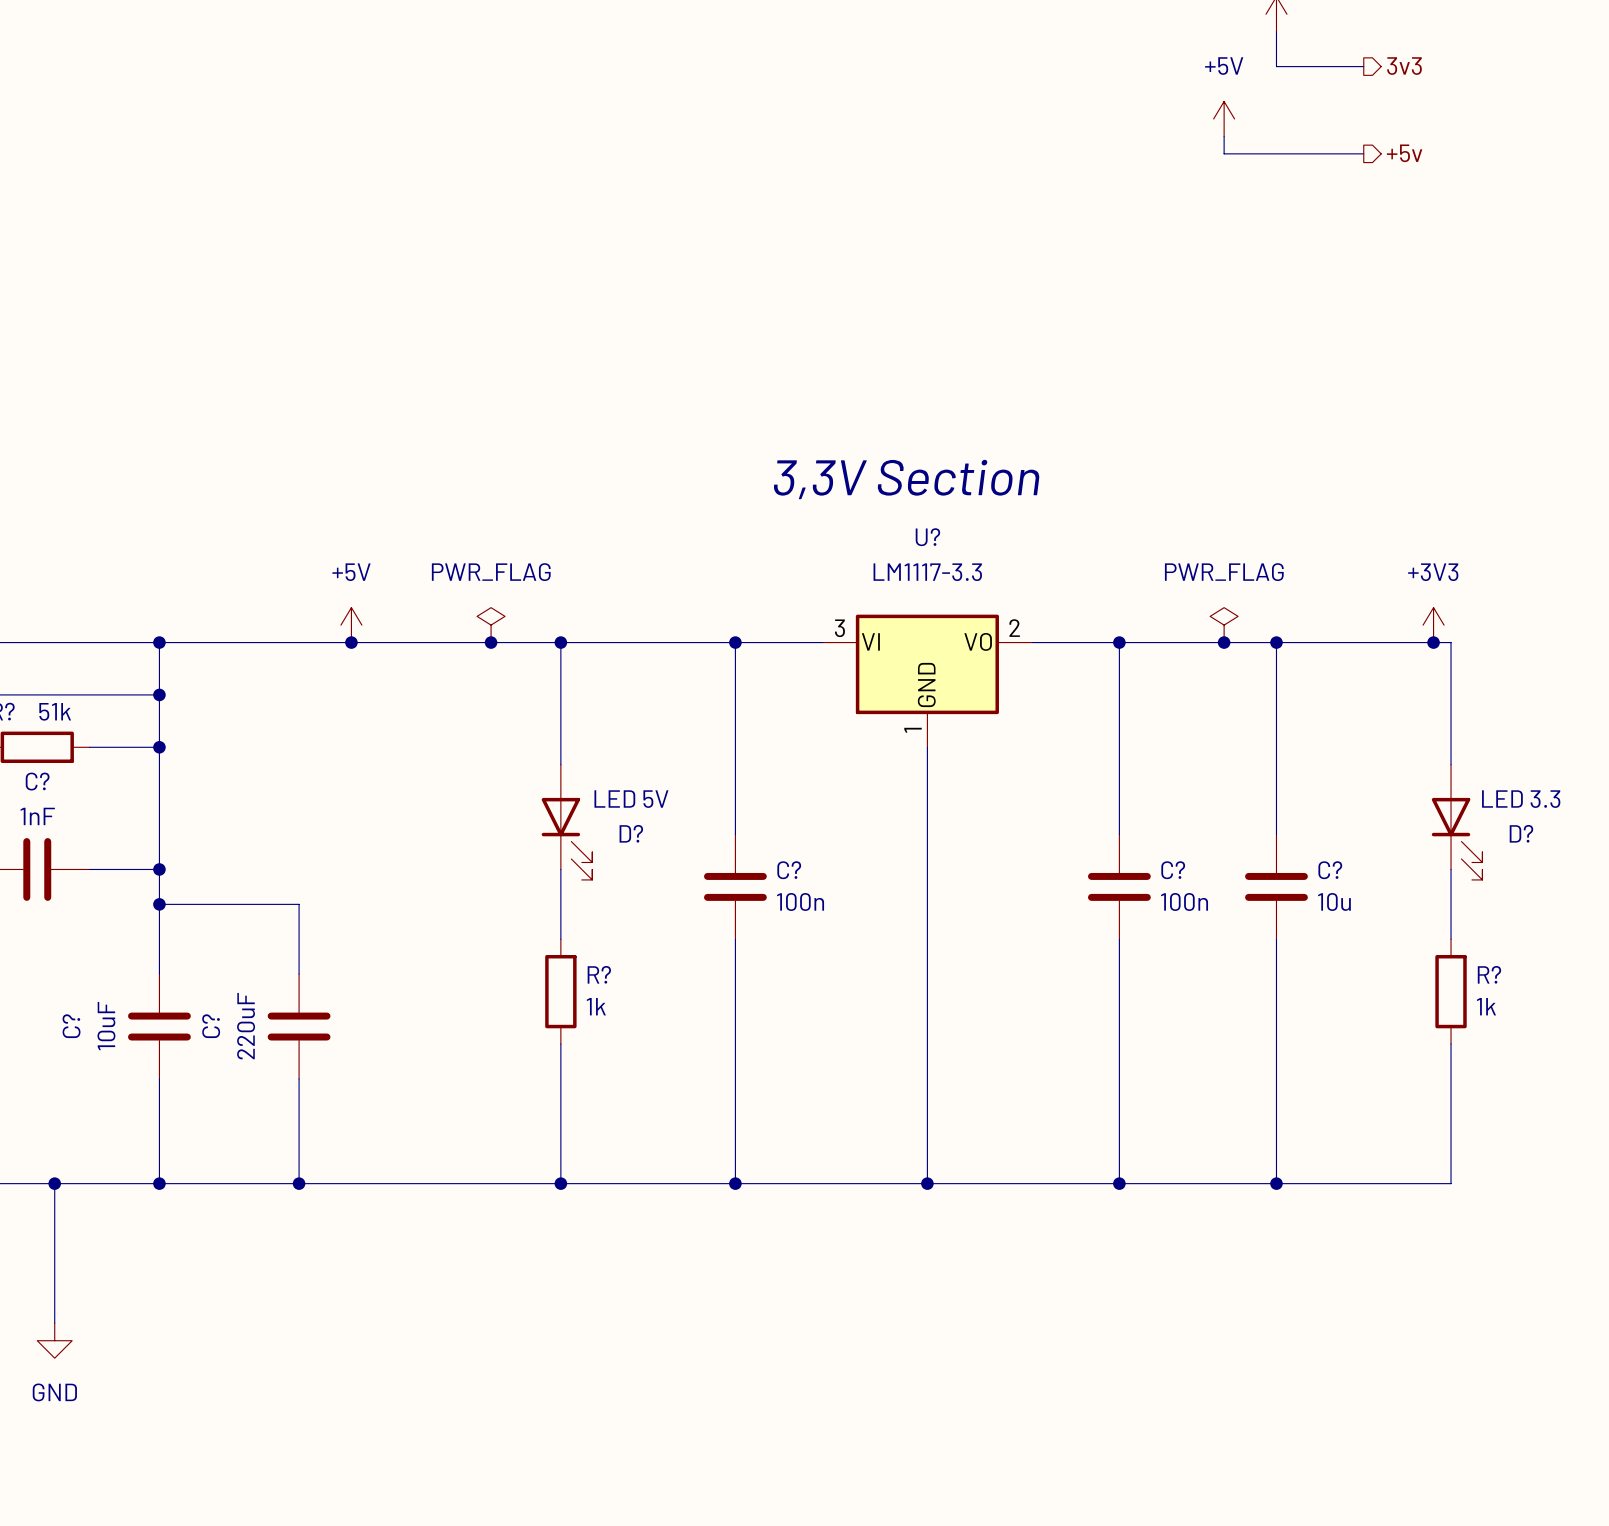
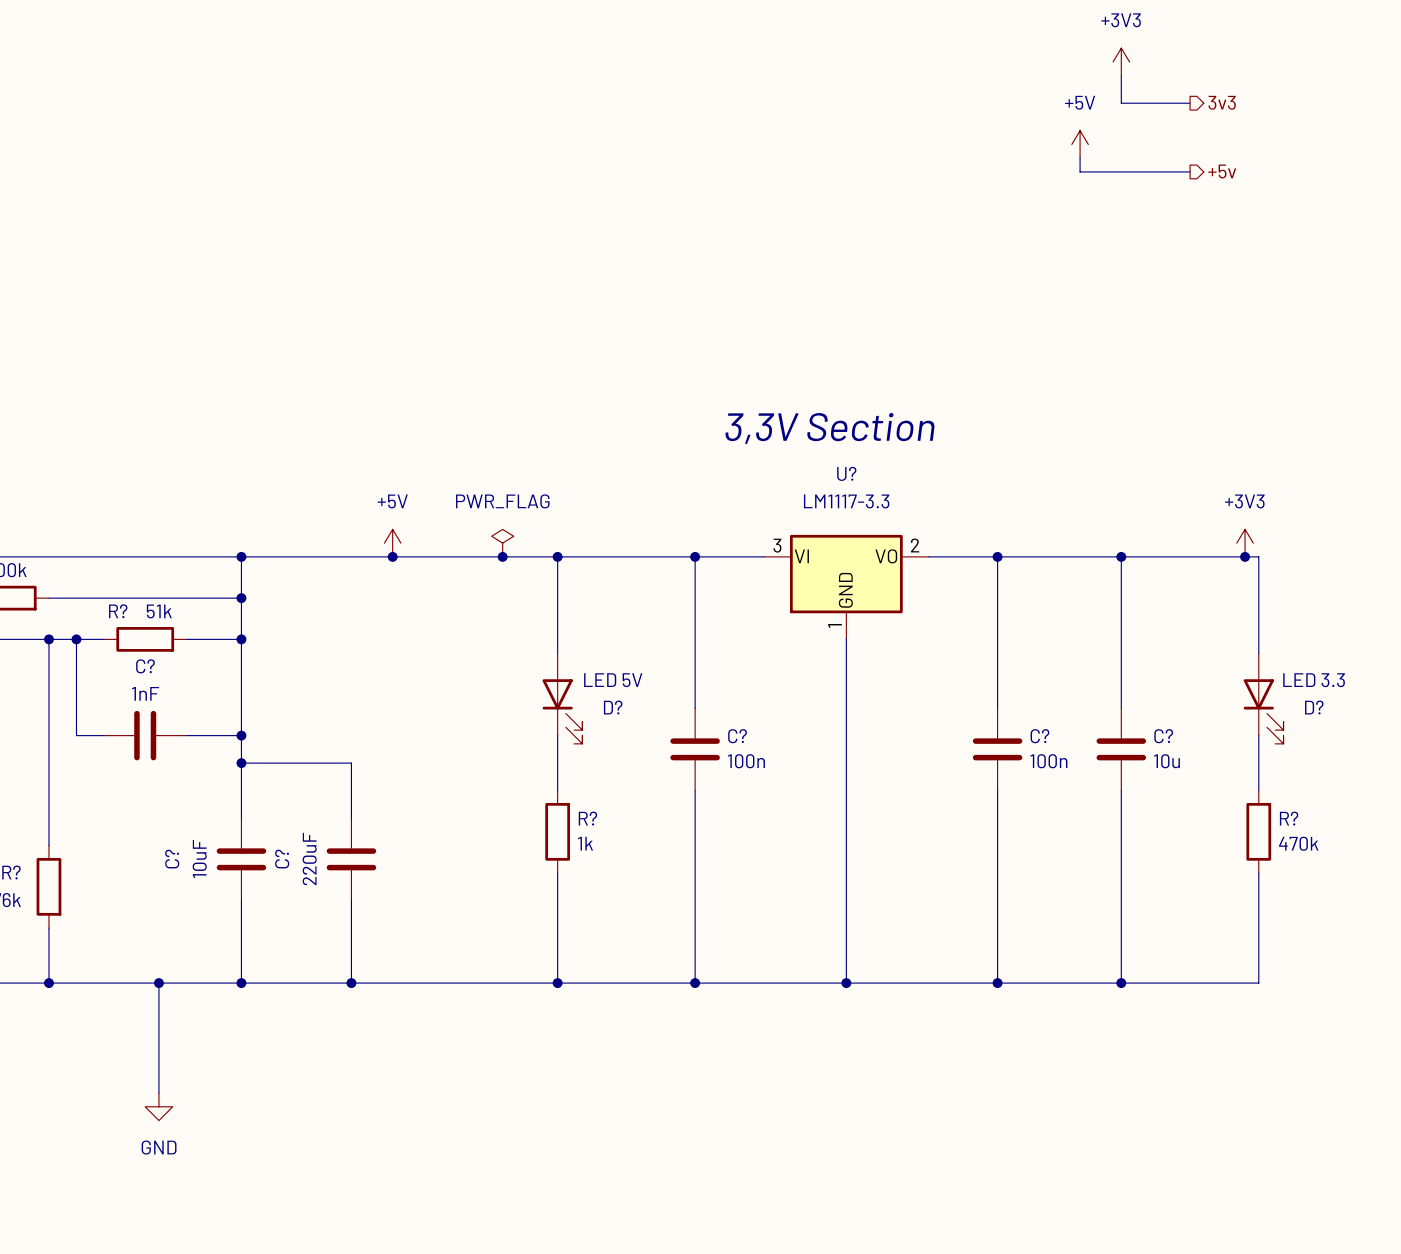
power symbol: PWR_FLAG (1224, 625) -> none
junction: (1224, 642) -> none
R? value: 1k (1486, 1006) -> 470k (1298, 843)

